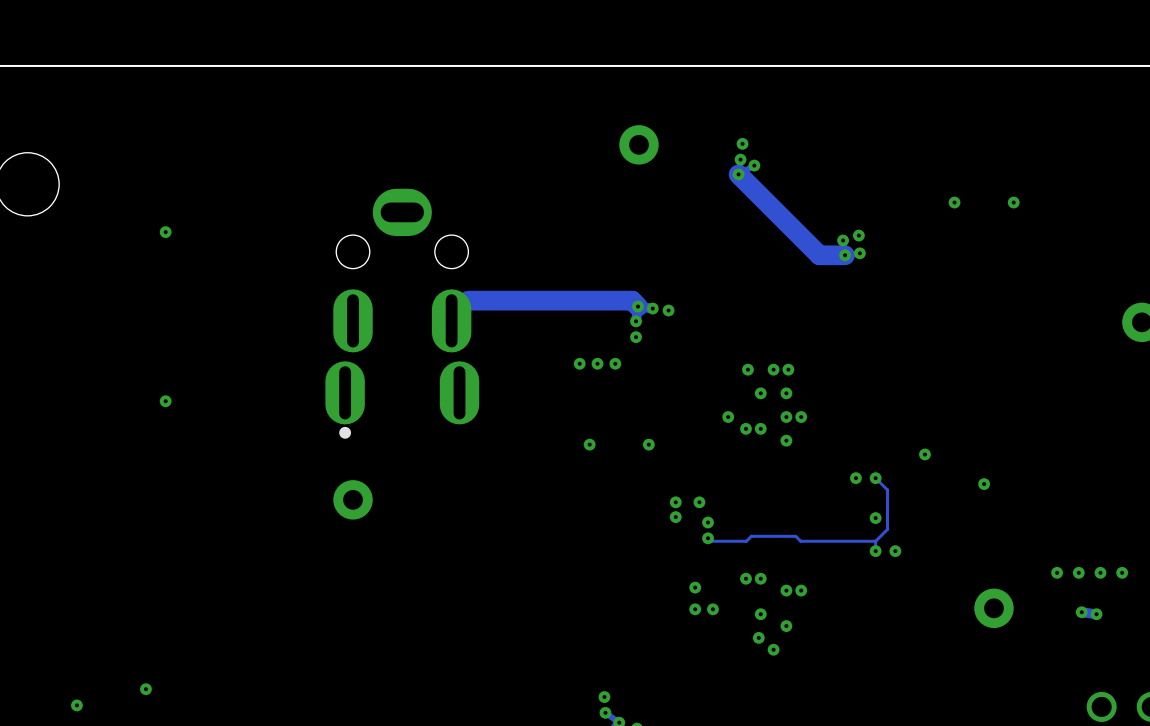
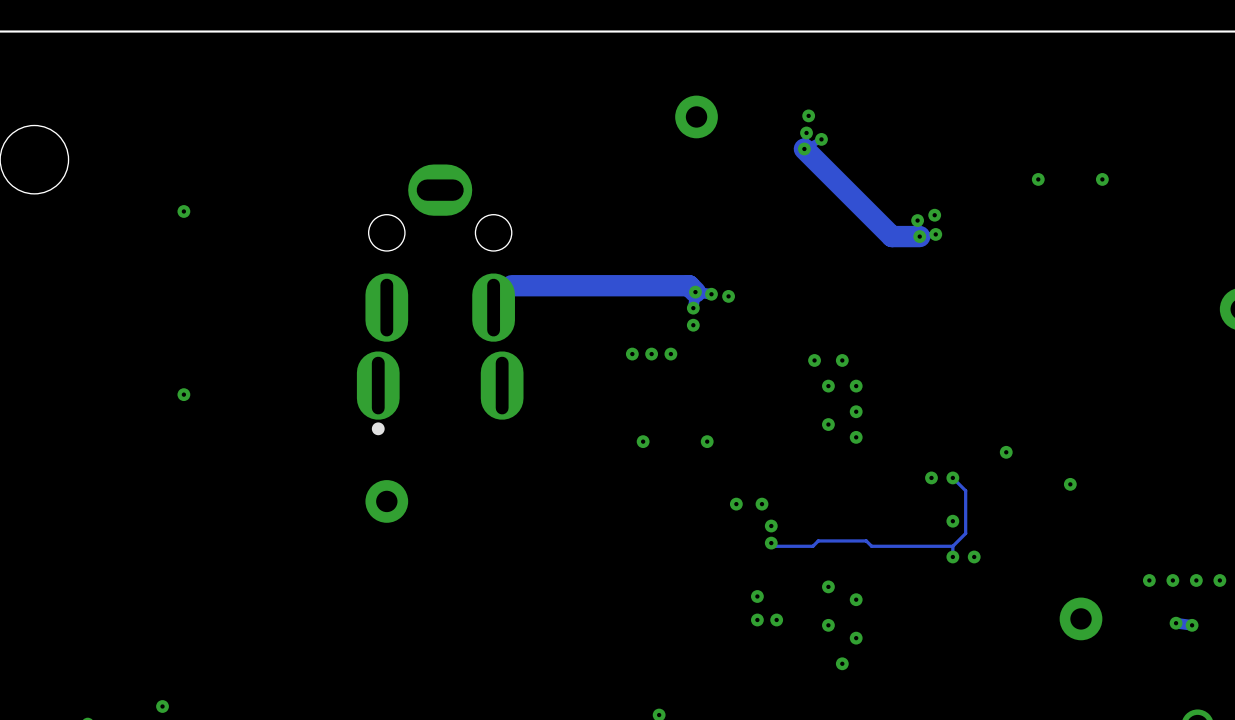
via: (788, 369) -> none
via: (728, 417) -> none
via: (801, 417) -> none
via: (745, 428) -> none
via: (675, 517) -> none
via: (745, 578) -> none
via: (801, 590) -> none
via: (758, 637) -> none

